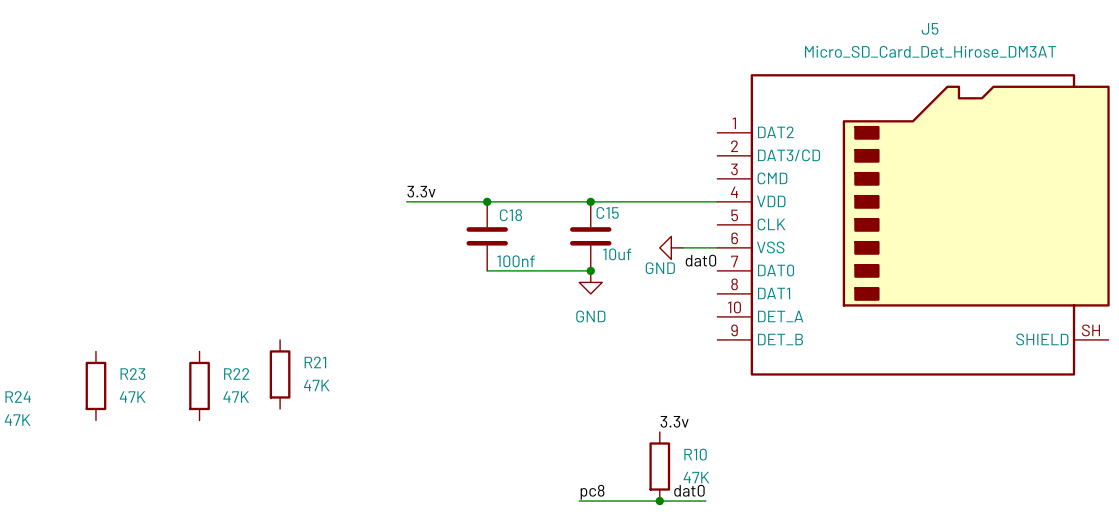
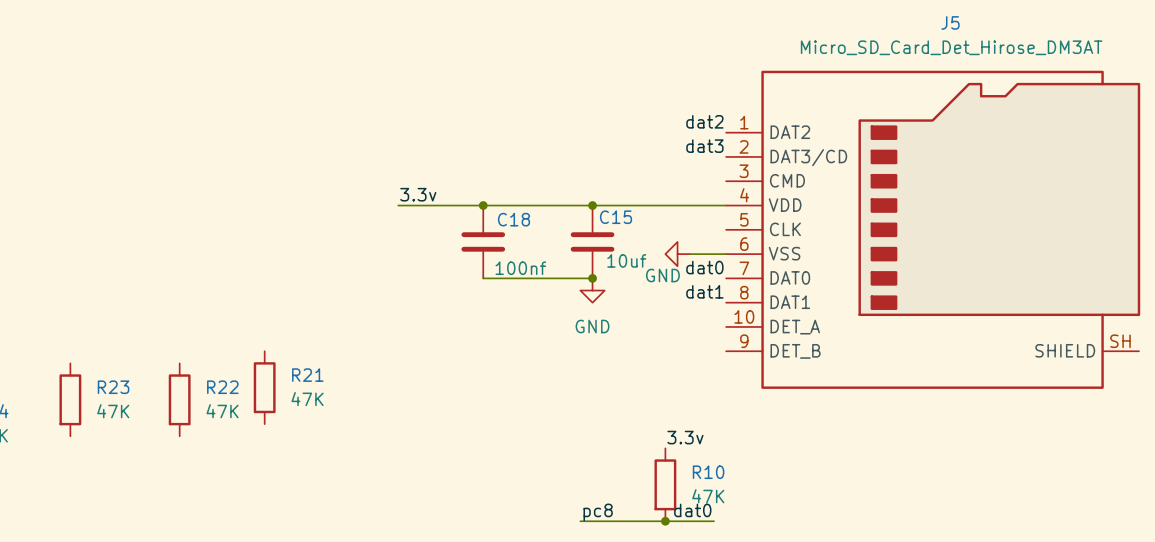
label: none -> dat2 (704, 121)
label: none -> dat3 (704, 146)
label: none -> dat1 (704, 291)

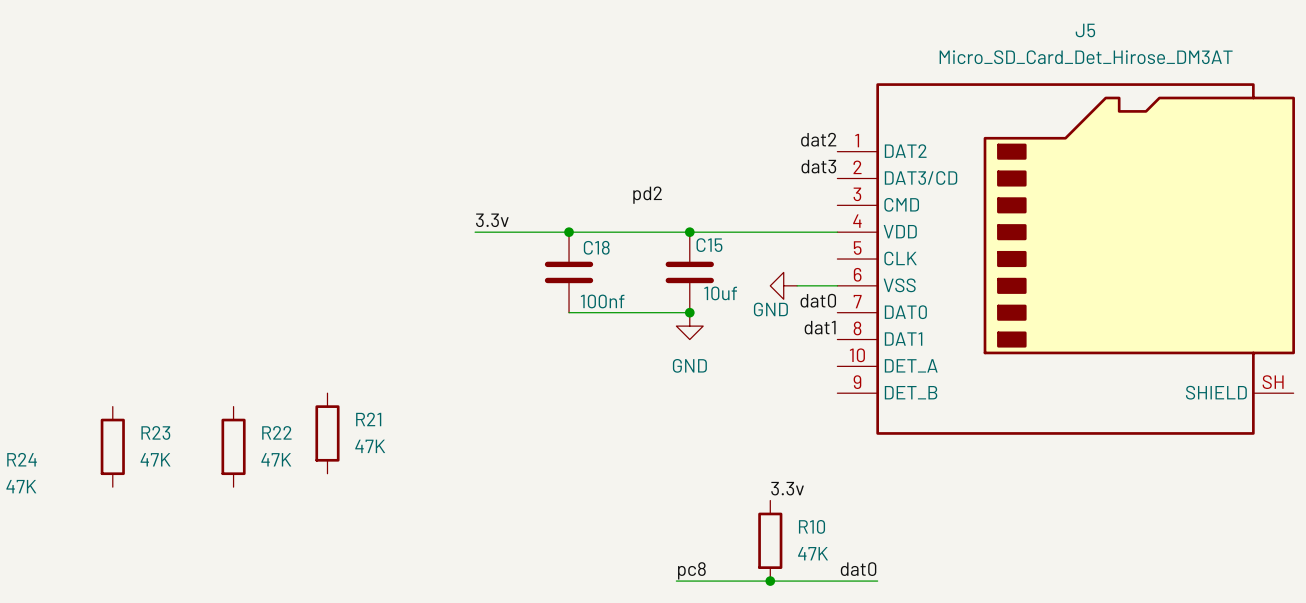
label: none -> pd2 (647, 195)
label position: dat0 (692, 510) -> dat0 (858, 569)
wire: none -> (823, 581) (877, 581)

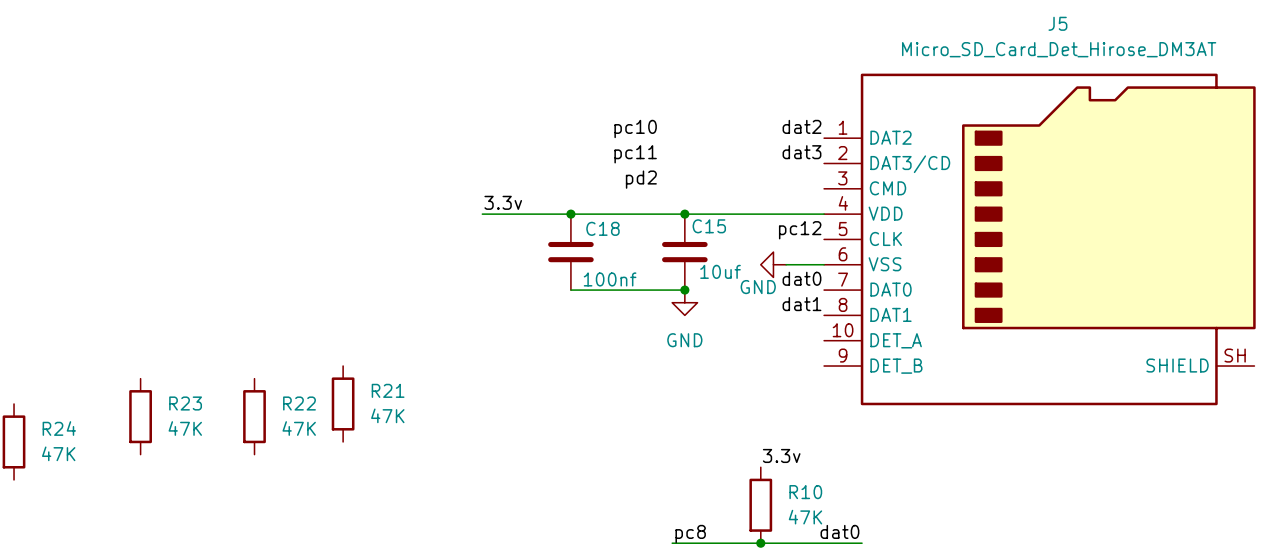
label: none -> pc10 (635, 128)
label: none -> pc11 (635, 154)
label: none -> pc12 (800, 230)

